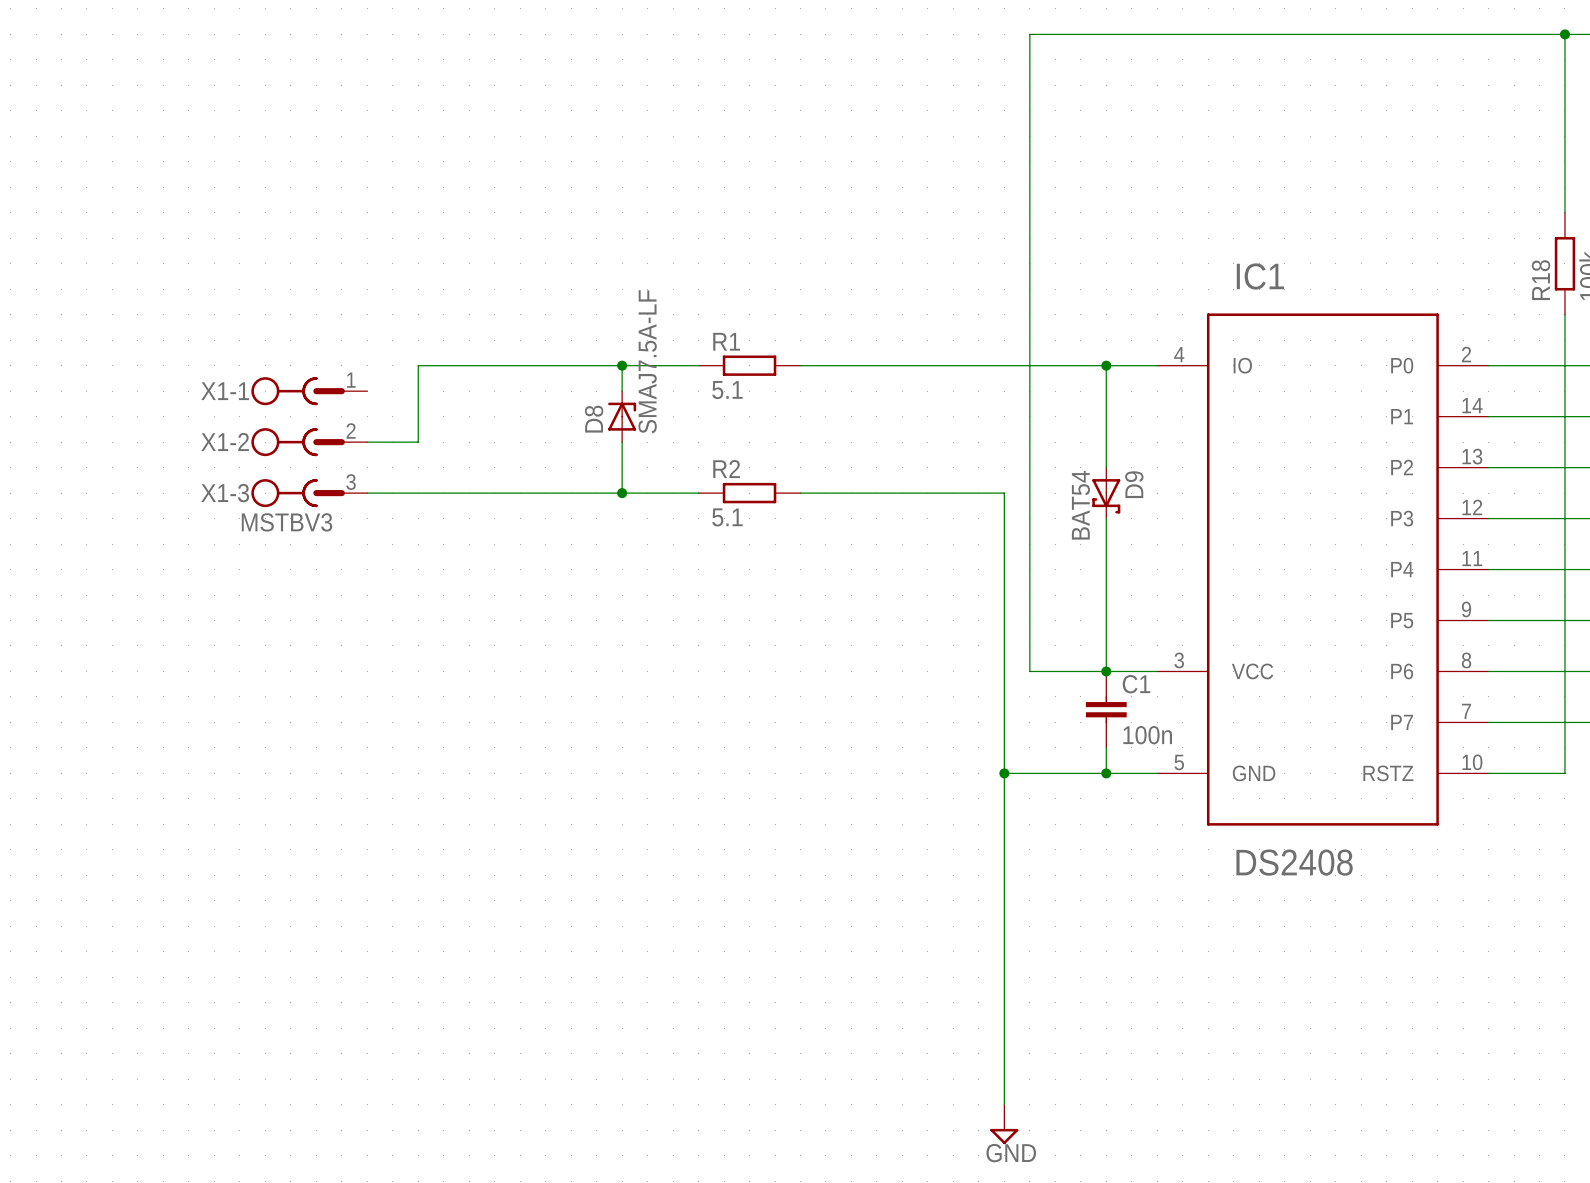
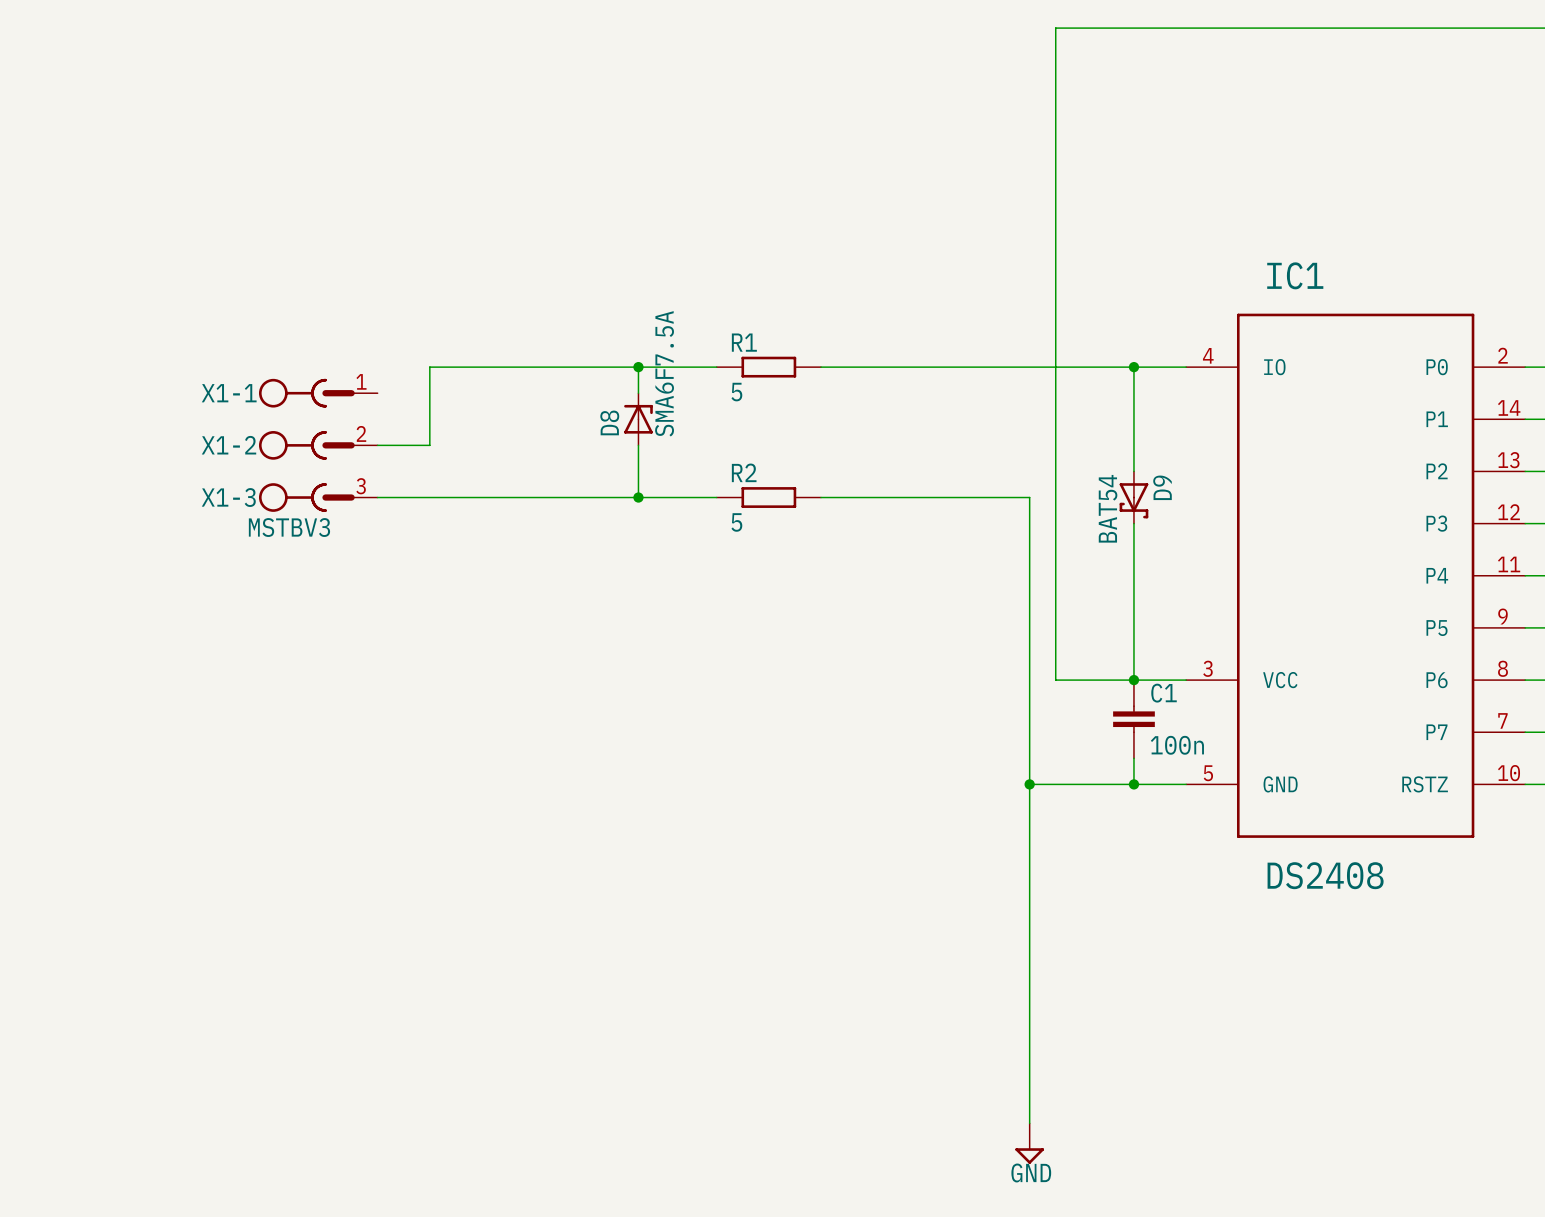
D8 value: SMAJ7.5A-LF (647, 361) -> SMA6F7.5A (664, 373)
R1 value: 5.1 (727, 390) -> 5 (736, 392)
R2 value: 5.1 (727, 517) -> 5 (736, 522)

